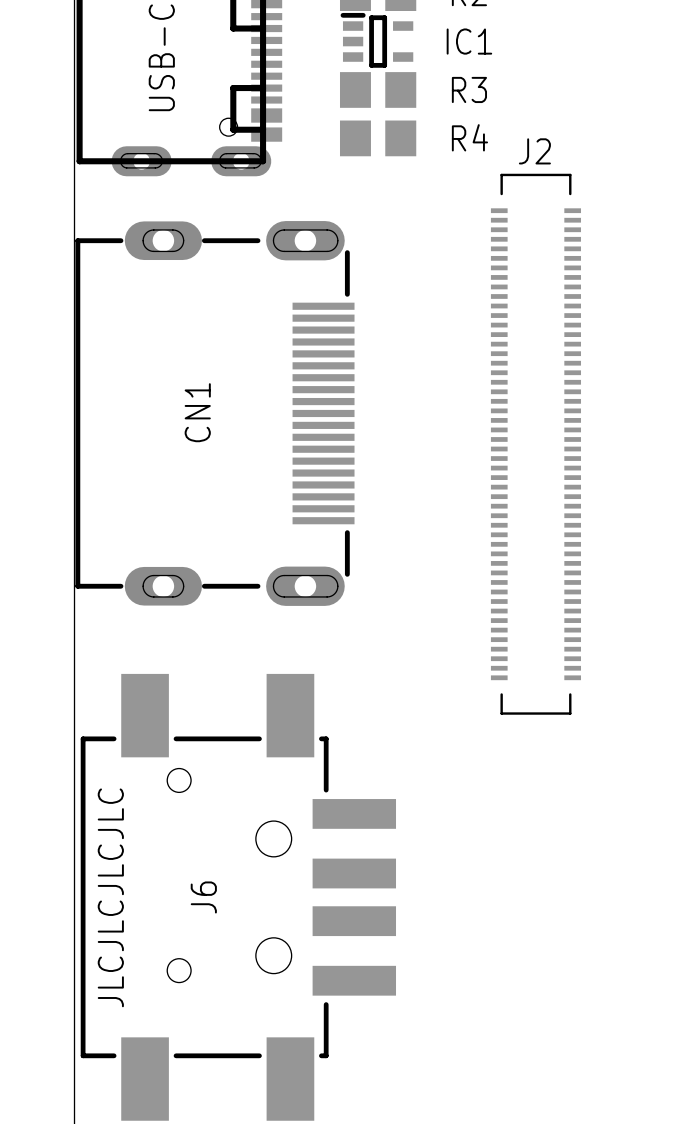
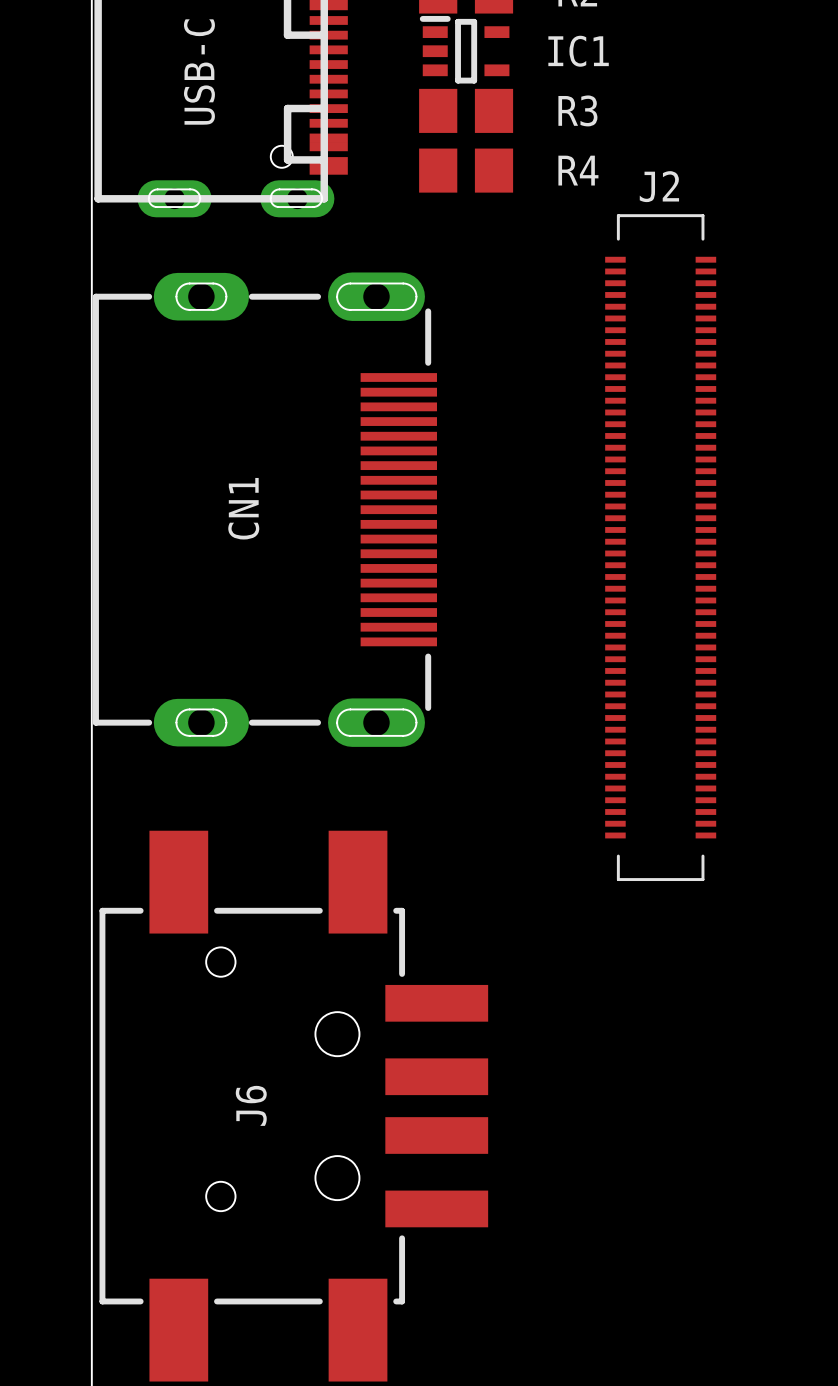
text: JLCJLCJLCJLC (110, 897) -> none

